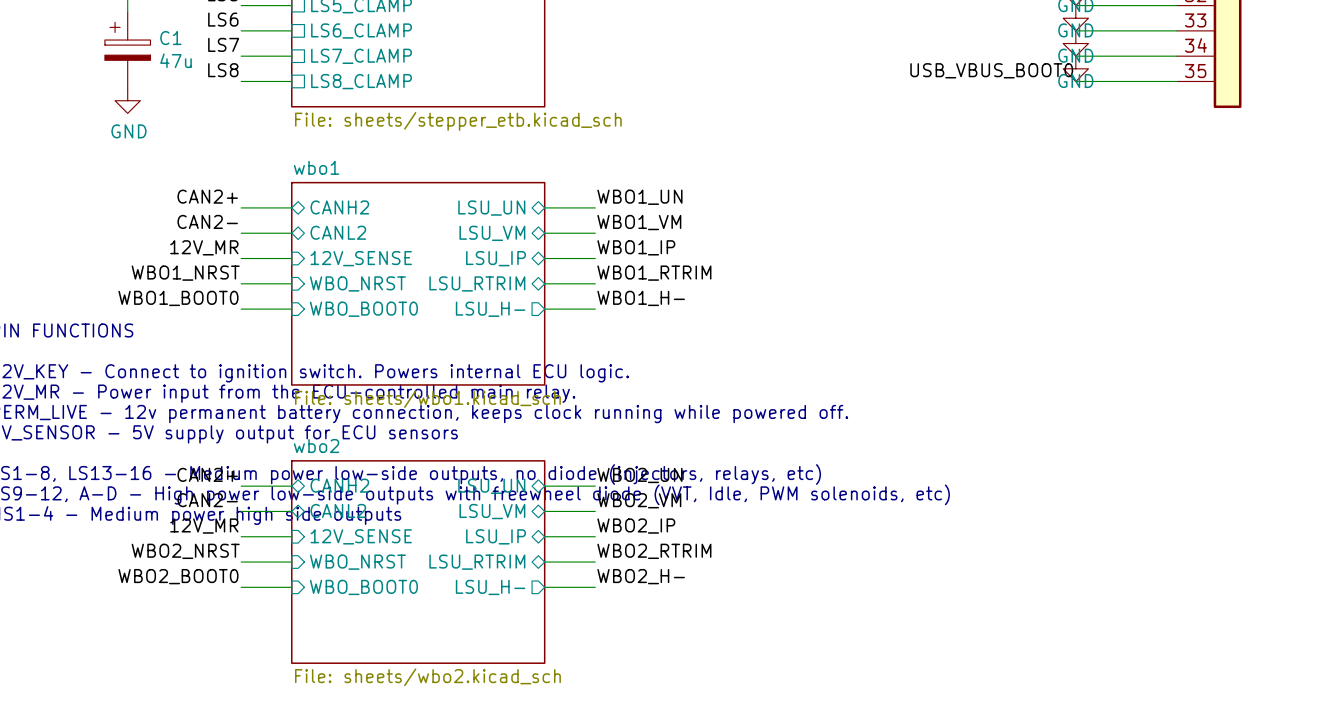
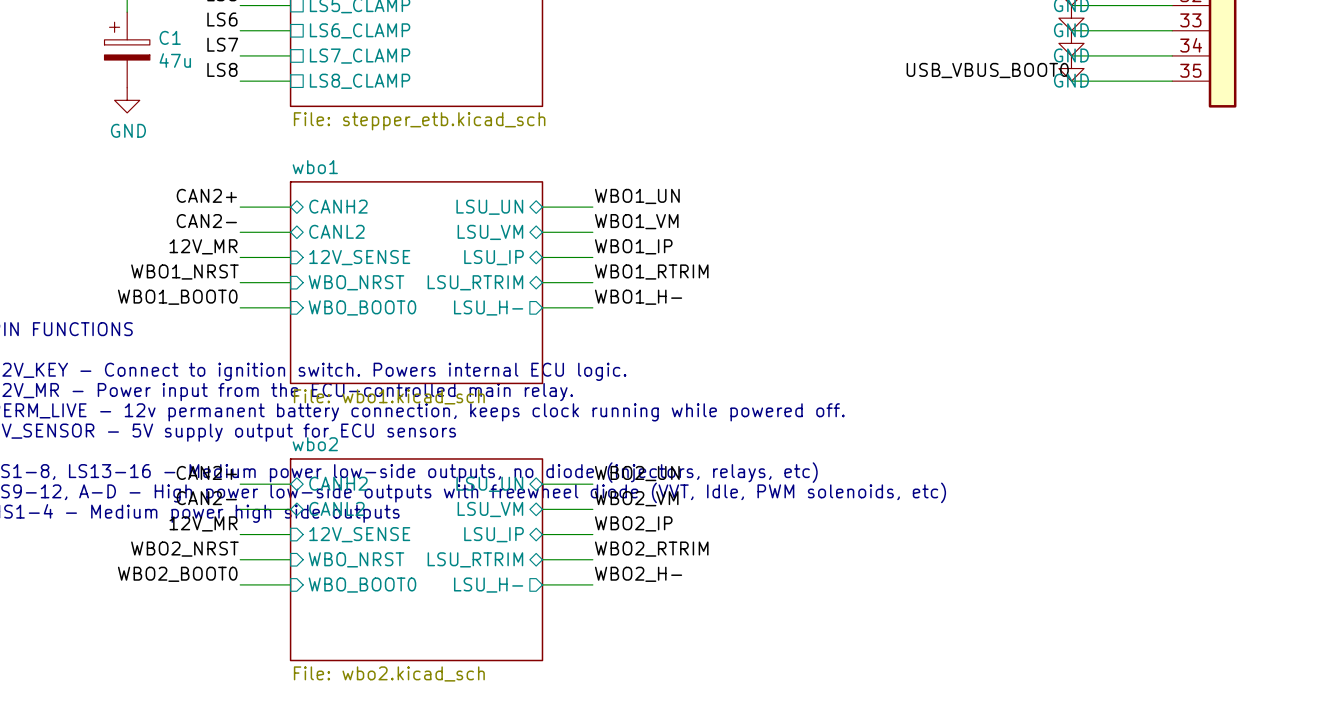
sheet value: File: sheets/stepper_etb.kicad_sch (458, 121) -> File: stepper_etb.kicad_sch (419, 121)
sheet wbo1 value: File: sheets/wbo1.kicad_sch (427, 399) -> File: wbo1.kicad_sch (389, 396)
sheet wbo2 value: File: sheets/wbo2.kicad_sch (427, 677) -> File: wbo2.kicad_sch (389, 673)

